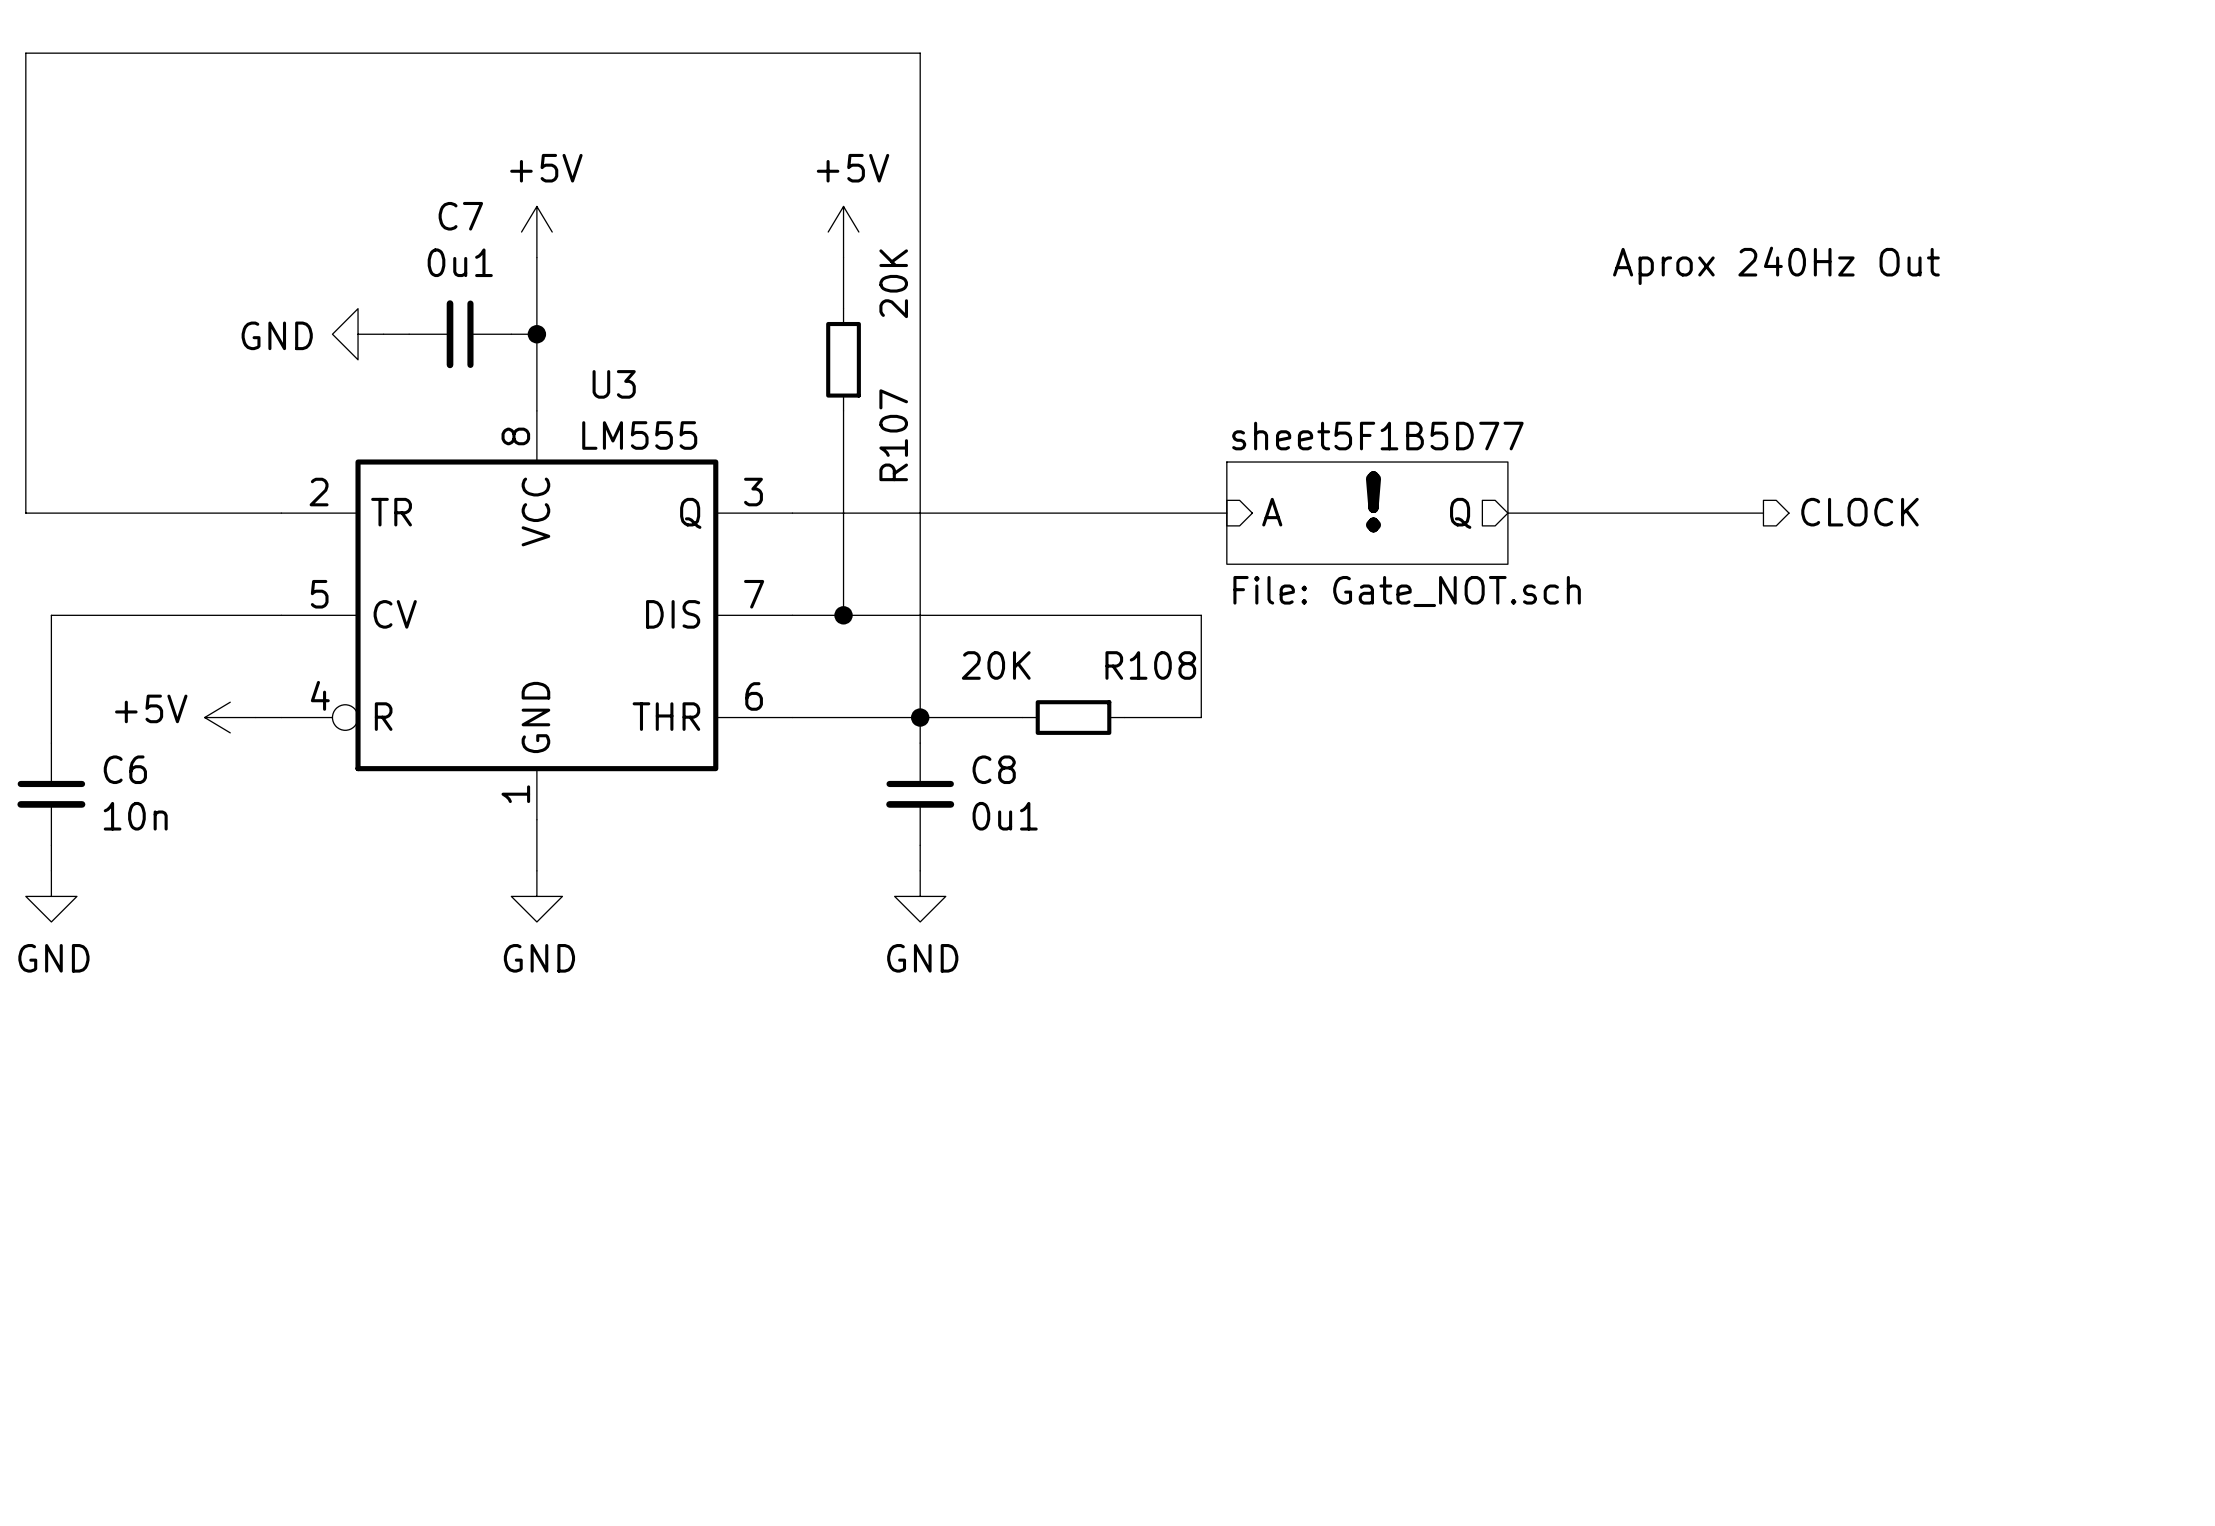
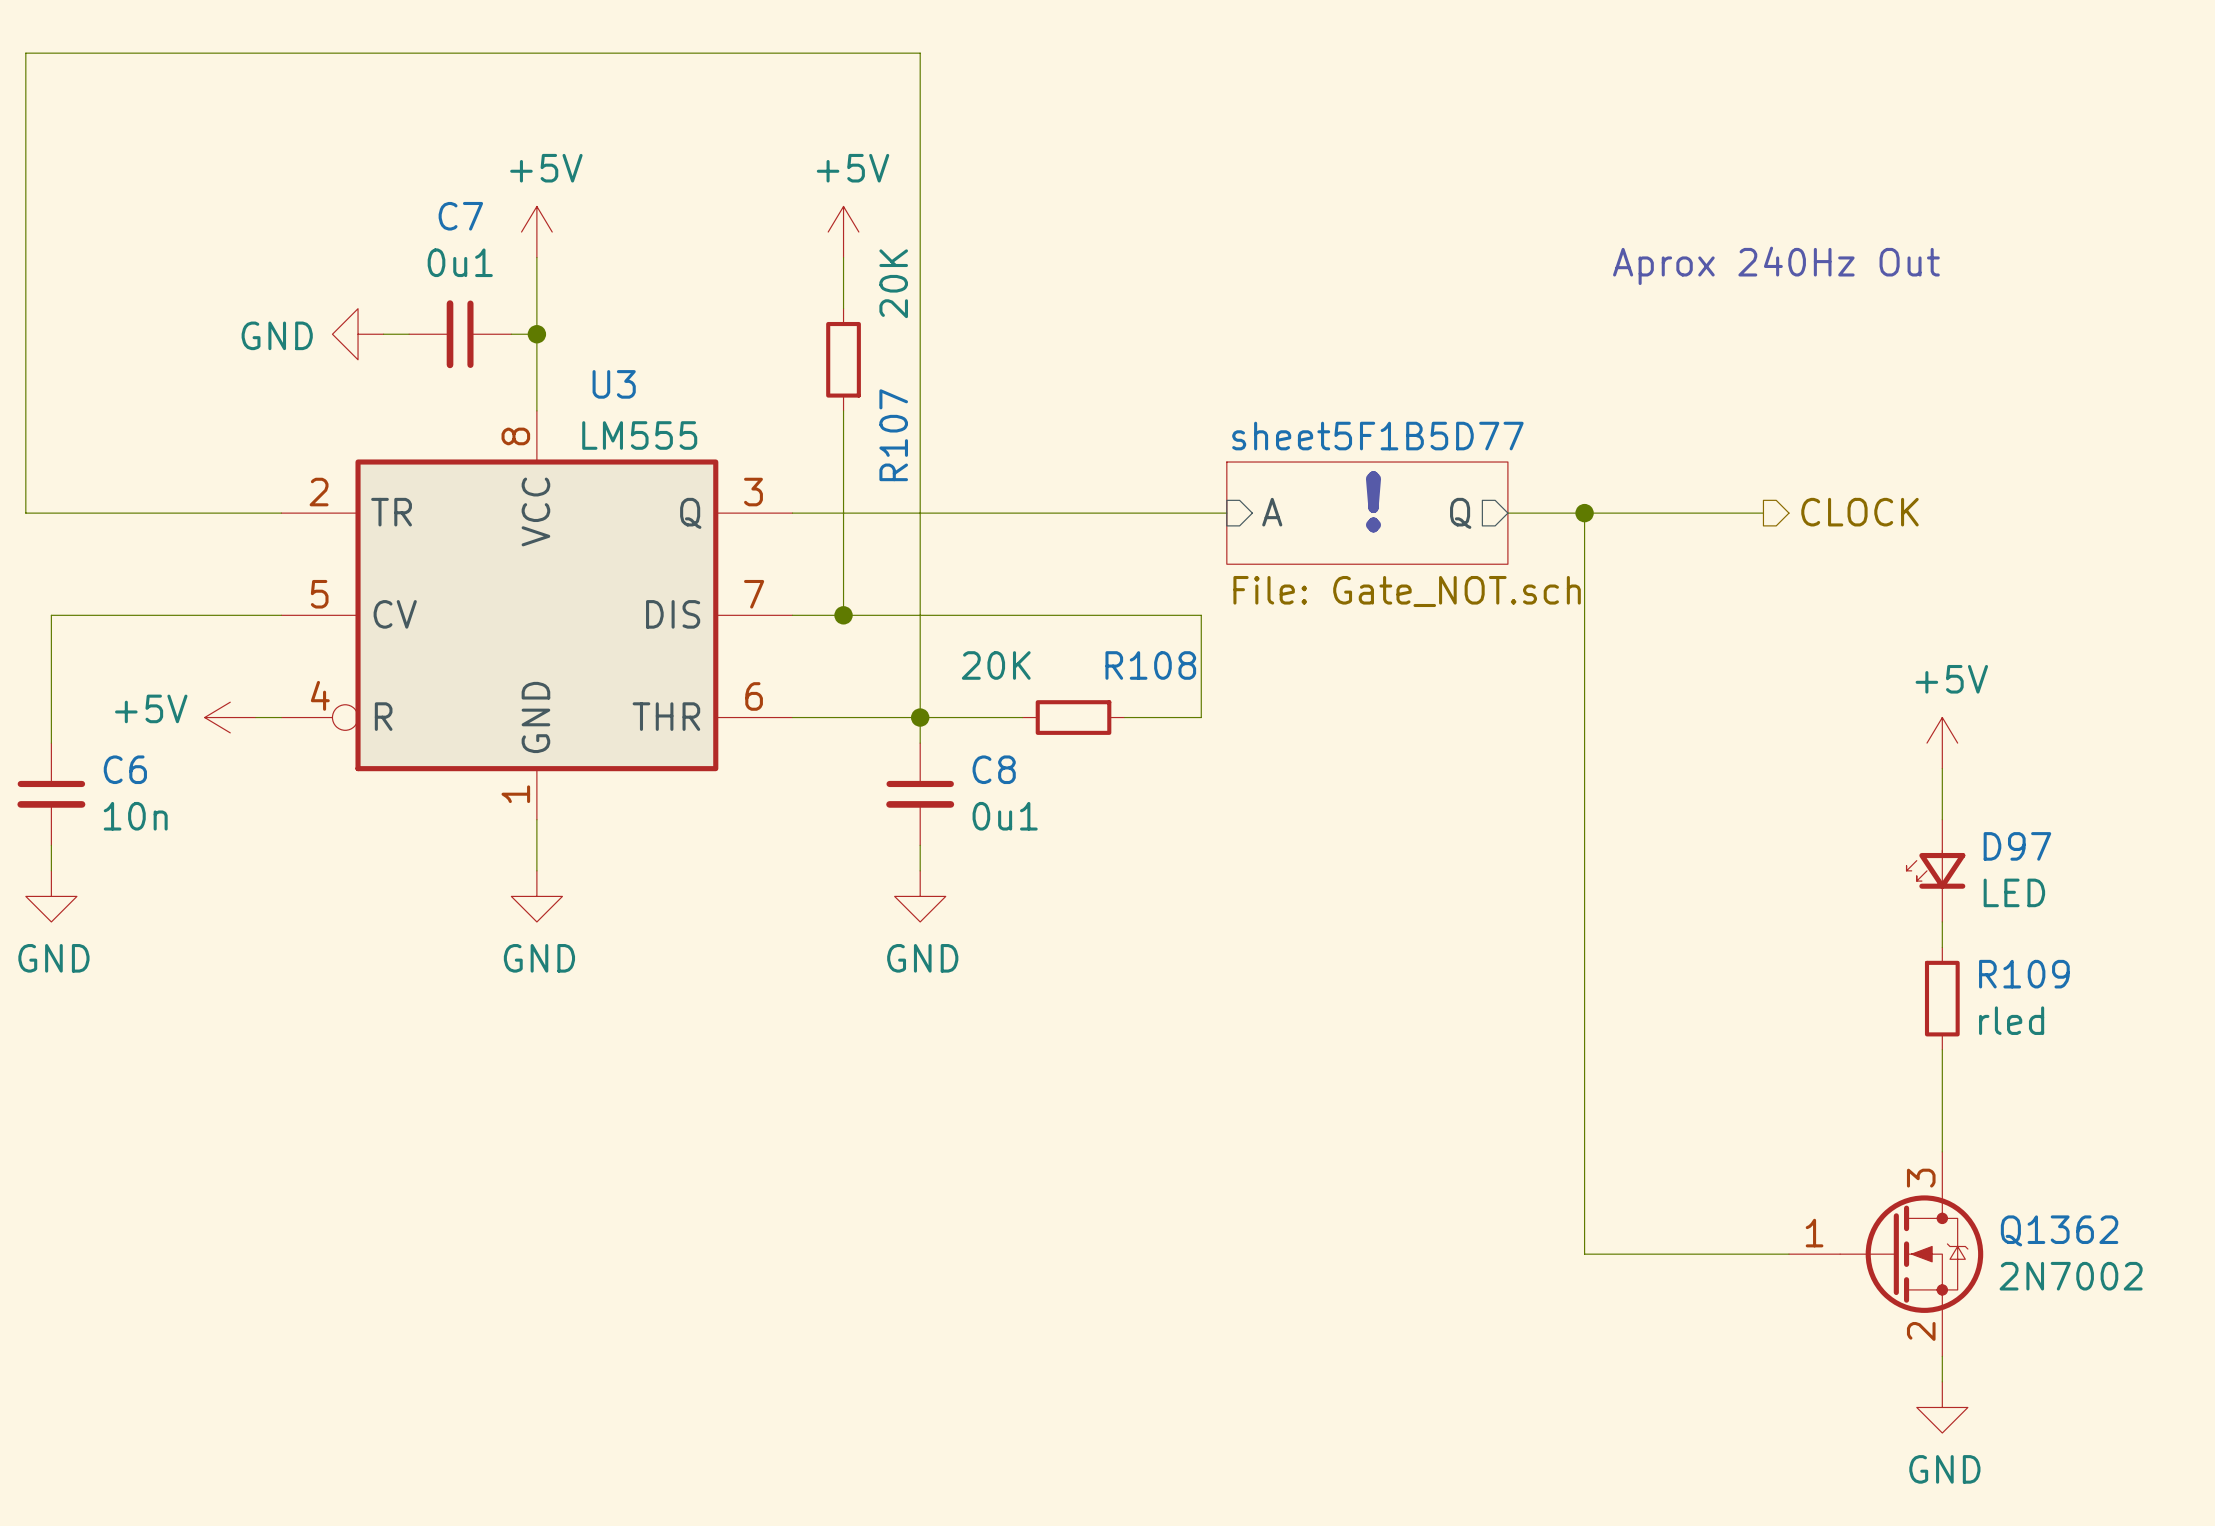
wire: none -> (1584, 513) (1584, 1254) (1789, 1254)
junction: none -> (1584, 513)
power symbol: none -> +5V (1942, 743)
wire: none -> (1942, 768) (1942, 819)
D97: none -> LED (1935, 870)
wire: none -> (1942, 921) (1942, 947)
R109: none -> rled (1942, 998)
wire: none -> (1942, 1049) (1942, 1151)
Q1362: none -> 2N7002 (1886, 1254)
wire: none -> (1942, 1356) (1942, 1381)
power symbol: none -> GND (1942, 1407)

